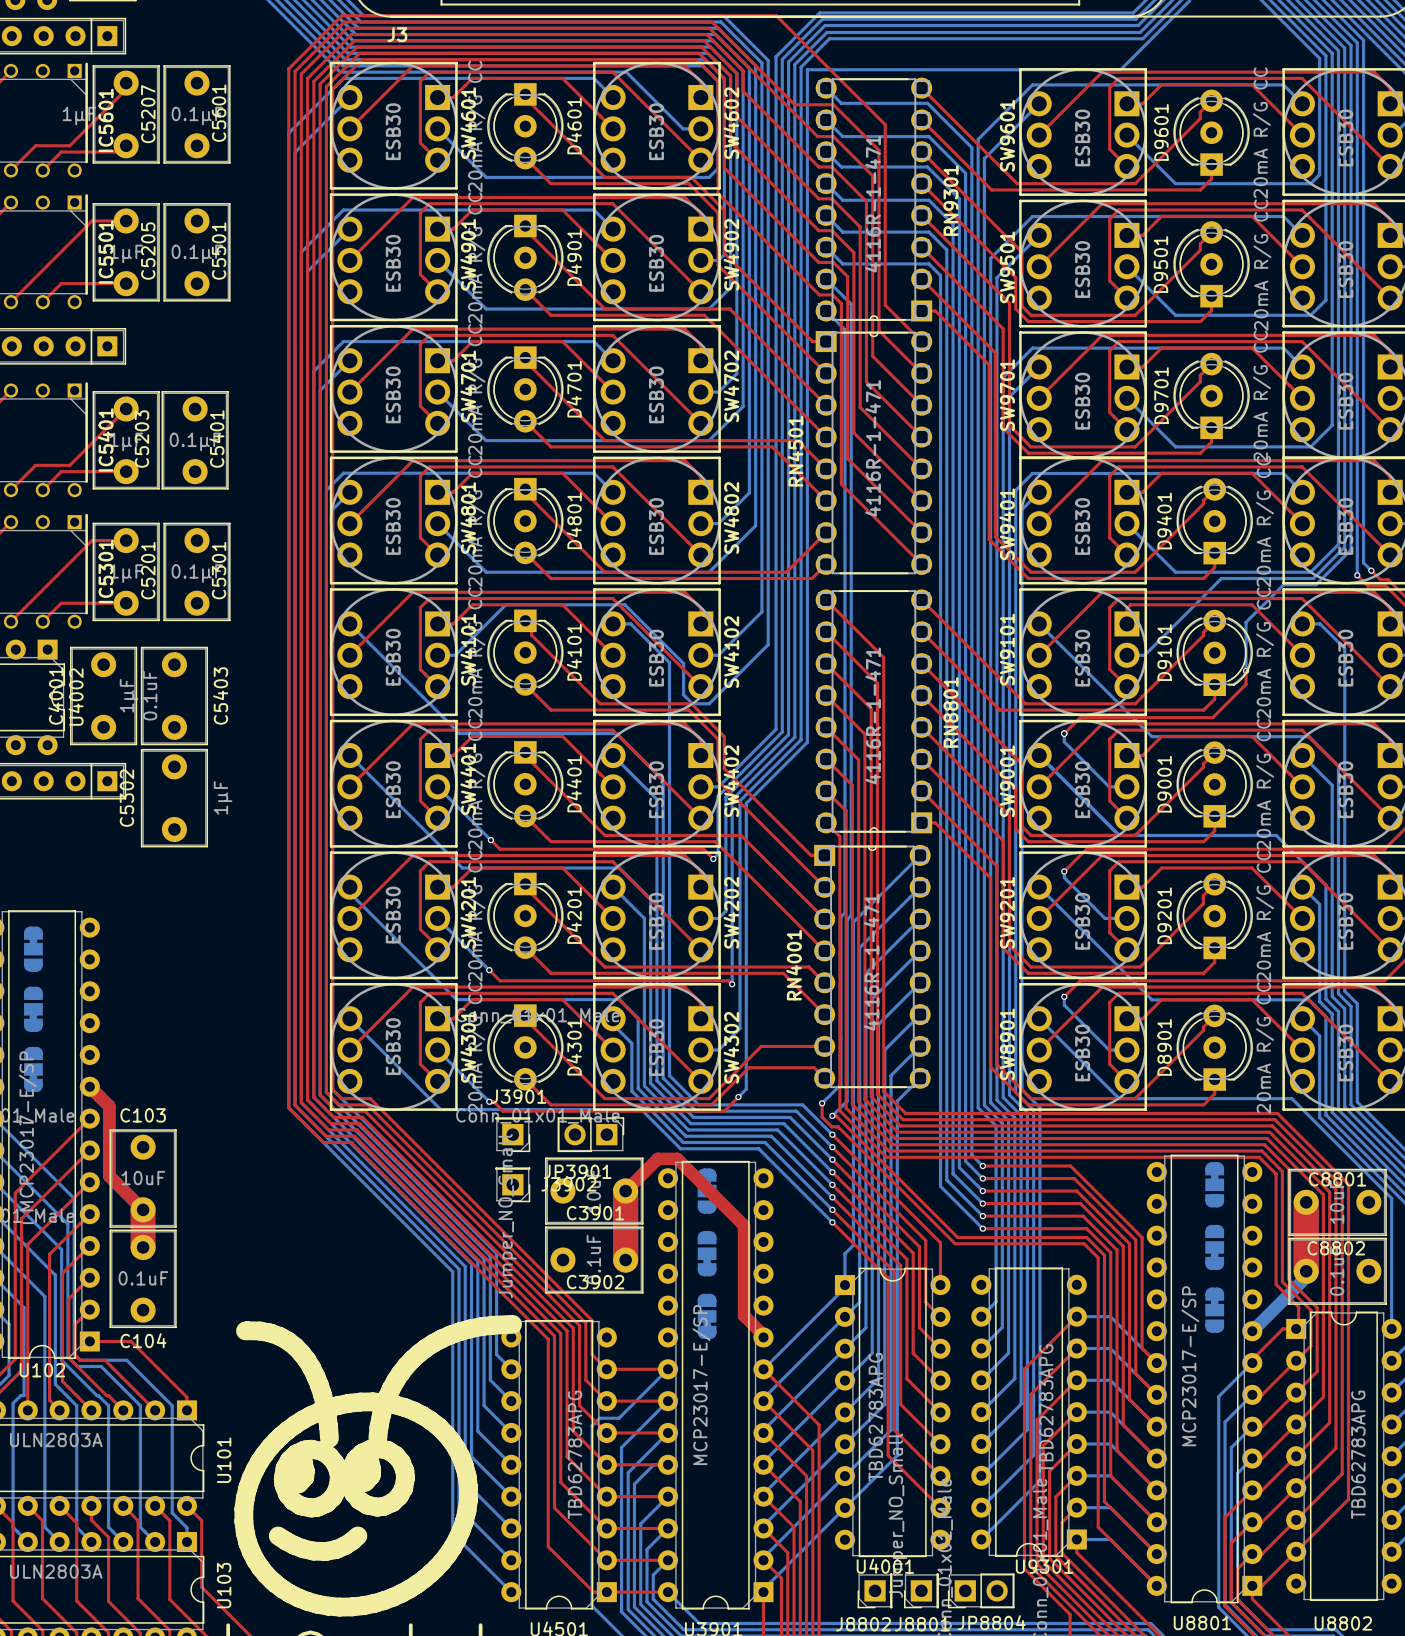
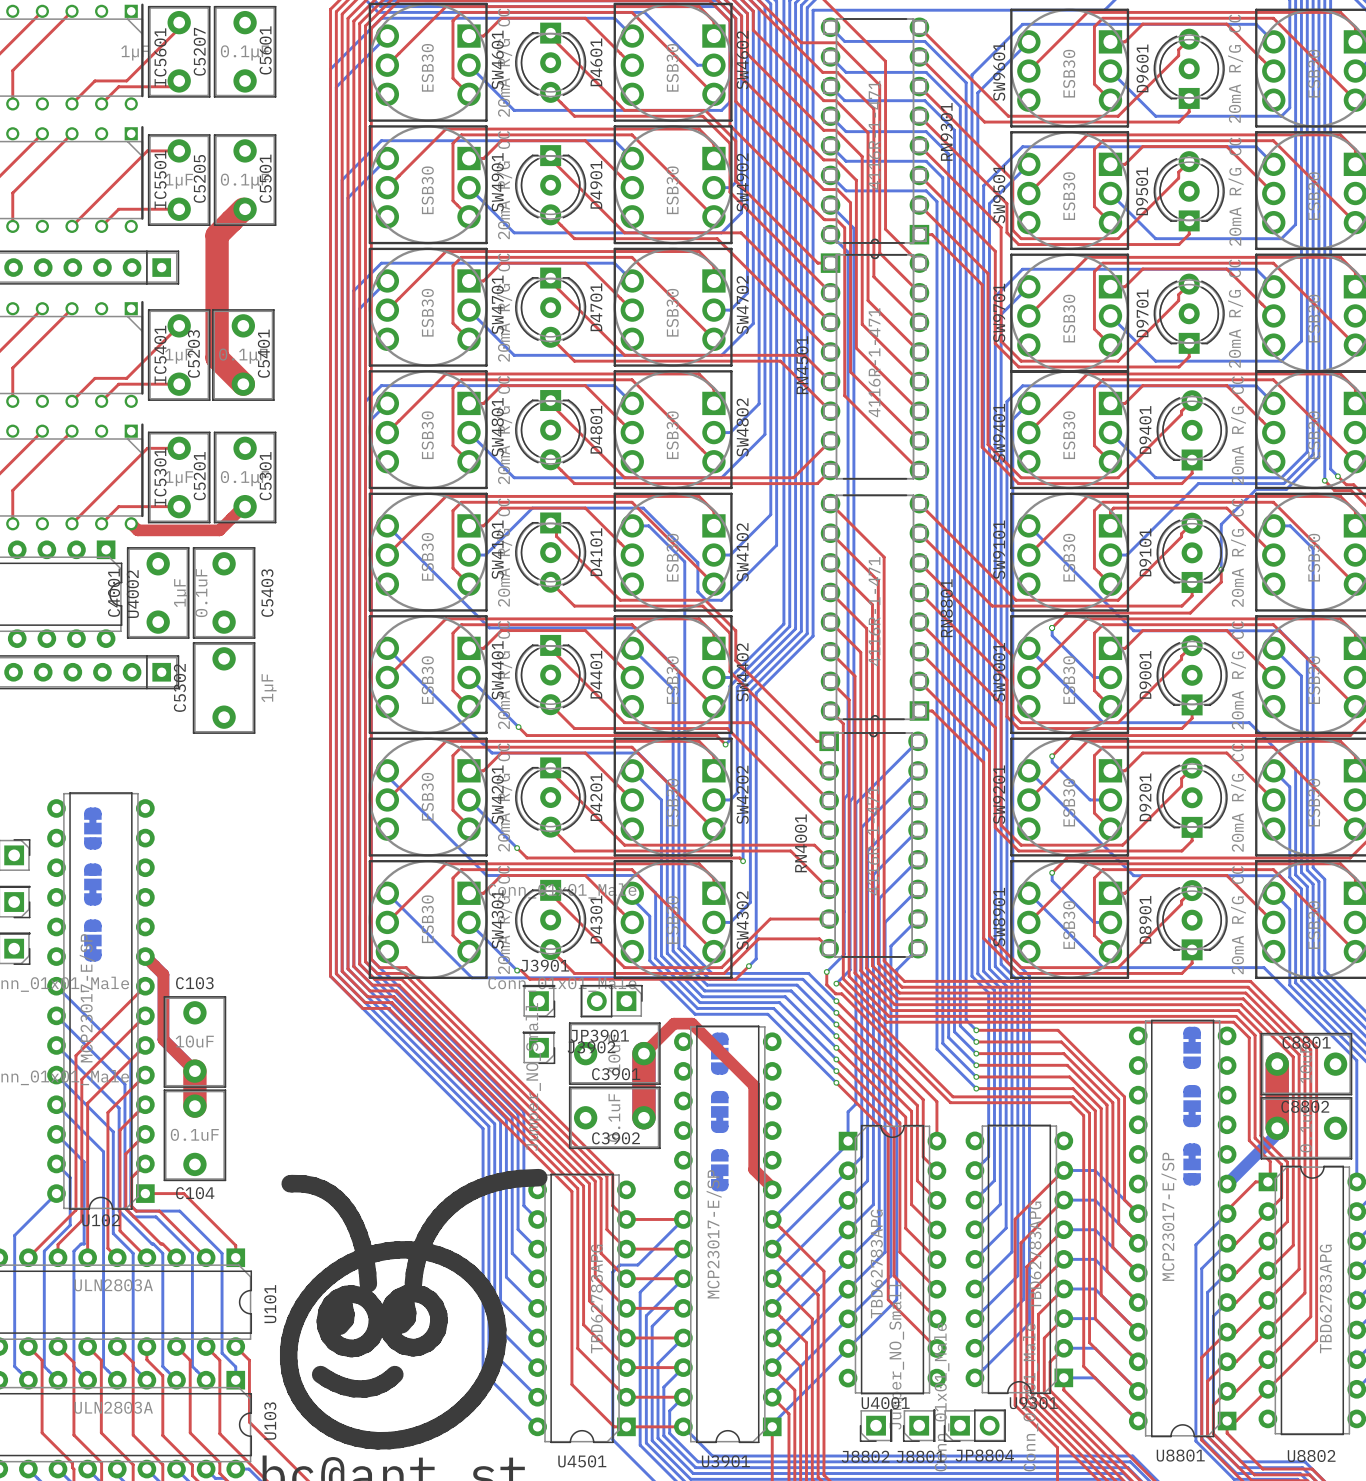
top track: none -> (243, 209) (217, 235) (217, 357) (243, 384)
top track: none -> (243, 506) (219, 530) (137, 530) (131, 523)

